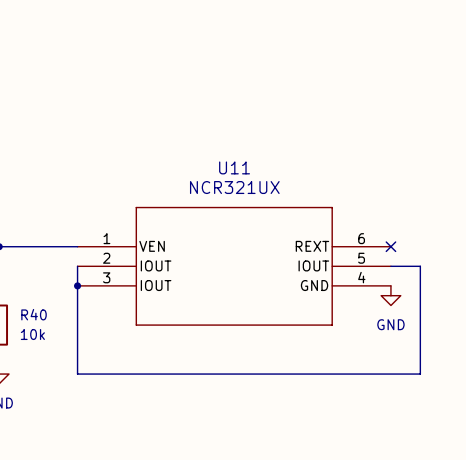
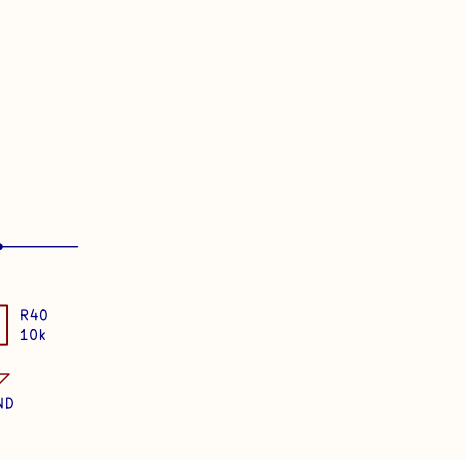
no-connect mark: (390, 246) -> none
wire: (77, 266) (77, 374) (420, 374) (420, 266) (390, 266) -> none
U11: NCR321UX (234, 266) -> none
junction: (77, 285) -> none
power symbol: GND (390, 295) -> none

